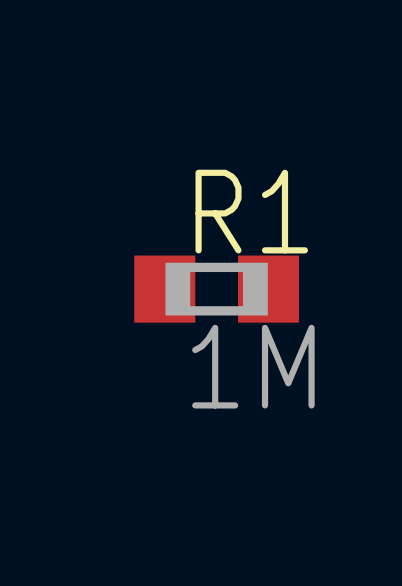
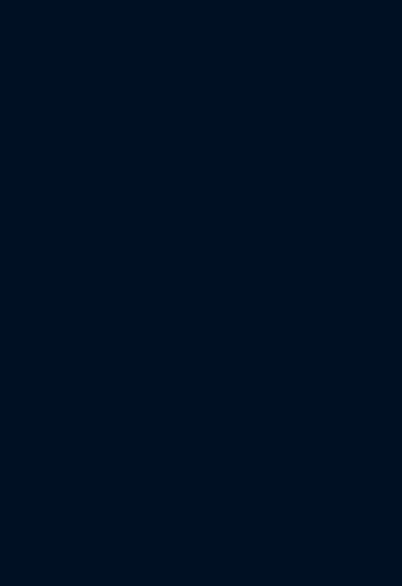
R1: 1M (216, 289) -> none

